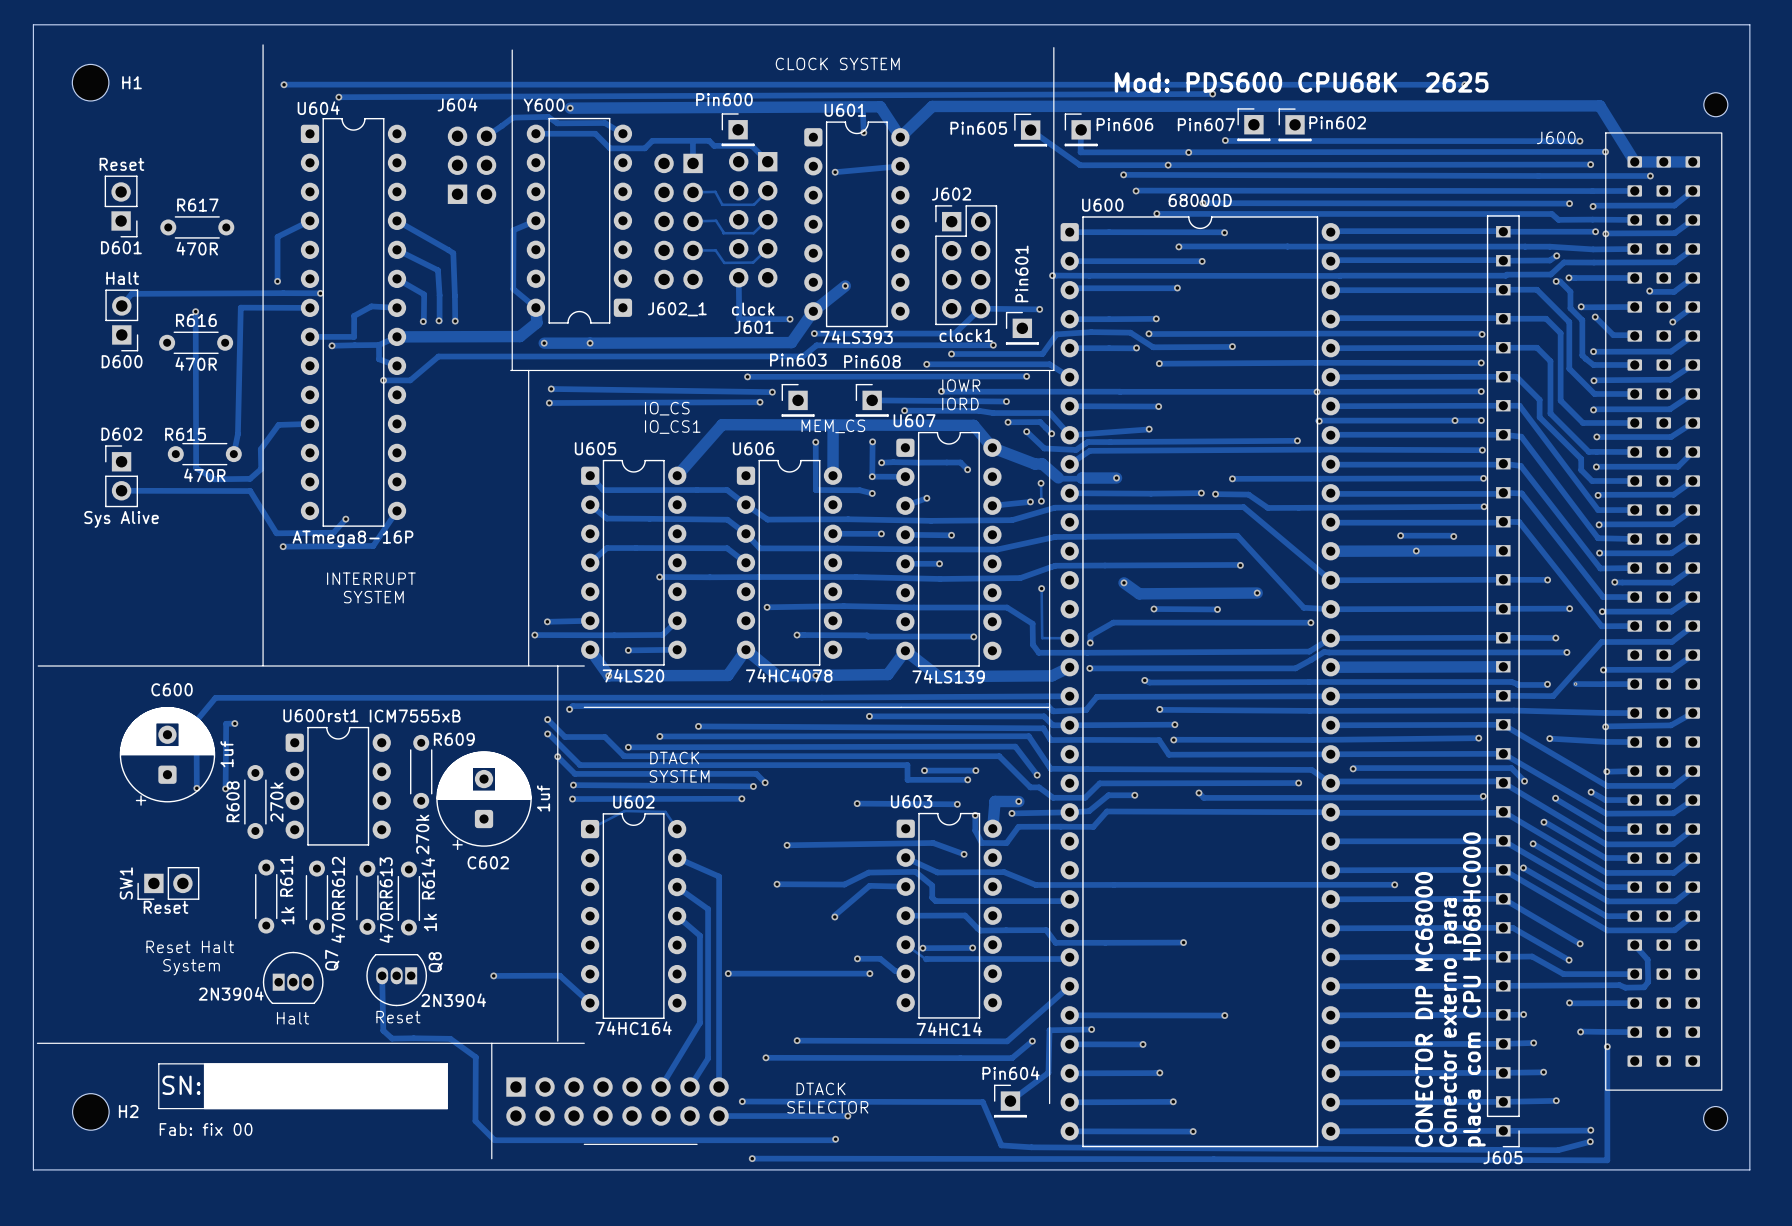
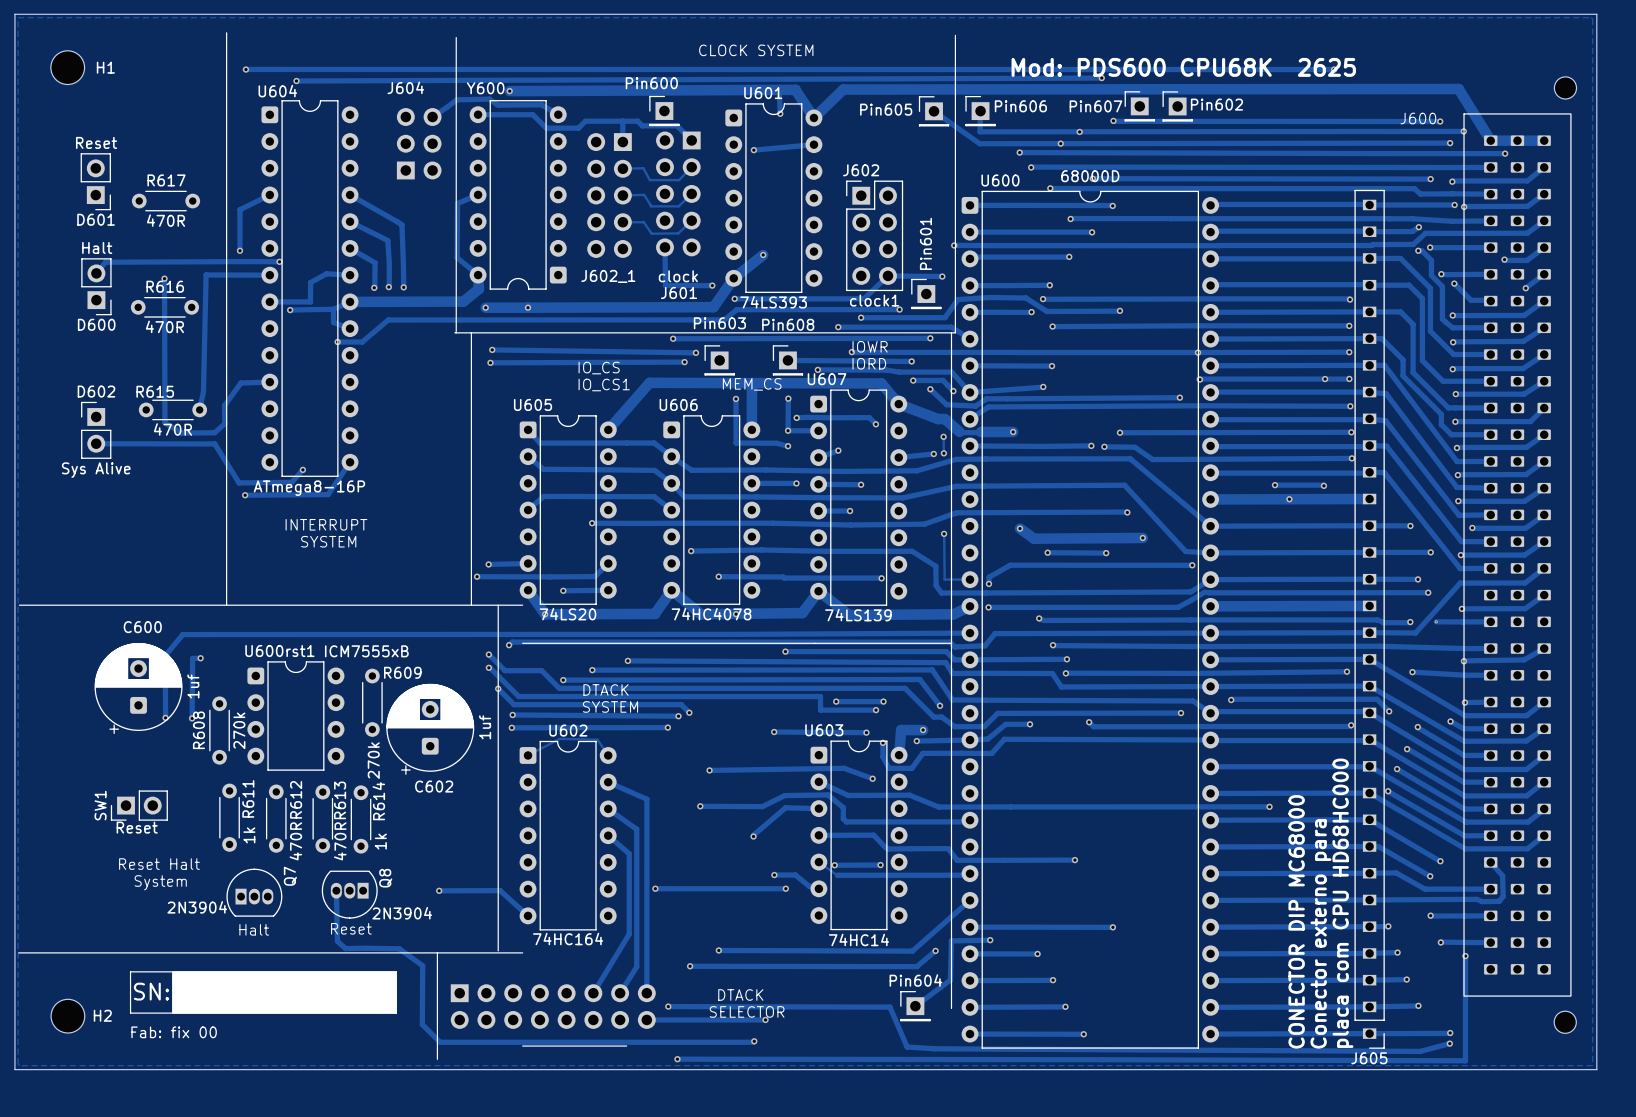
zone outline: none -> (18, 17) (1591, 17) (1592, 1065) (19, 1065) (18, 1064) (18, 17)

